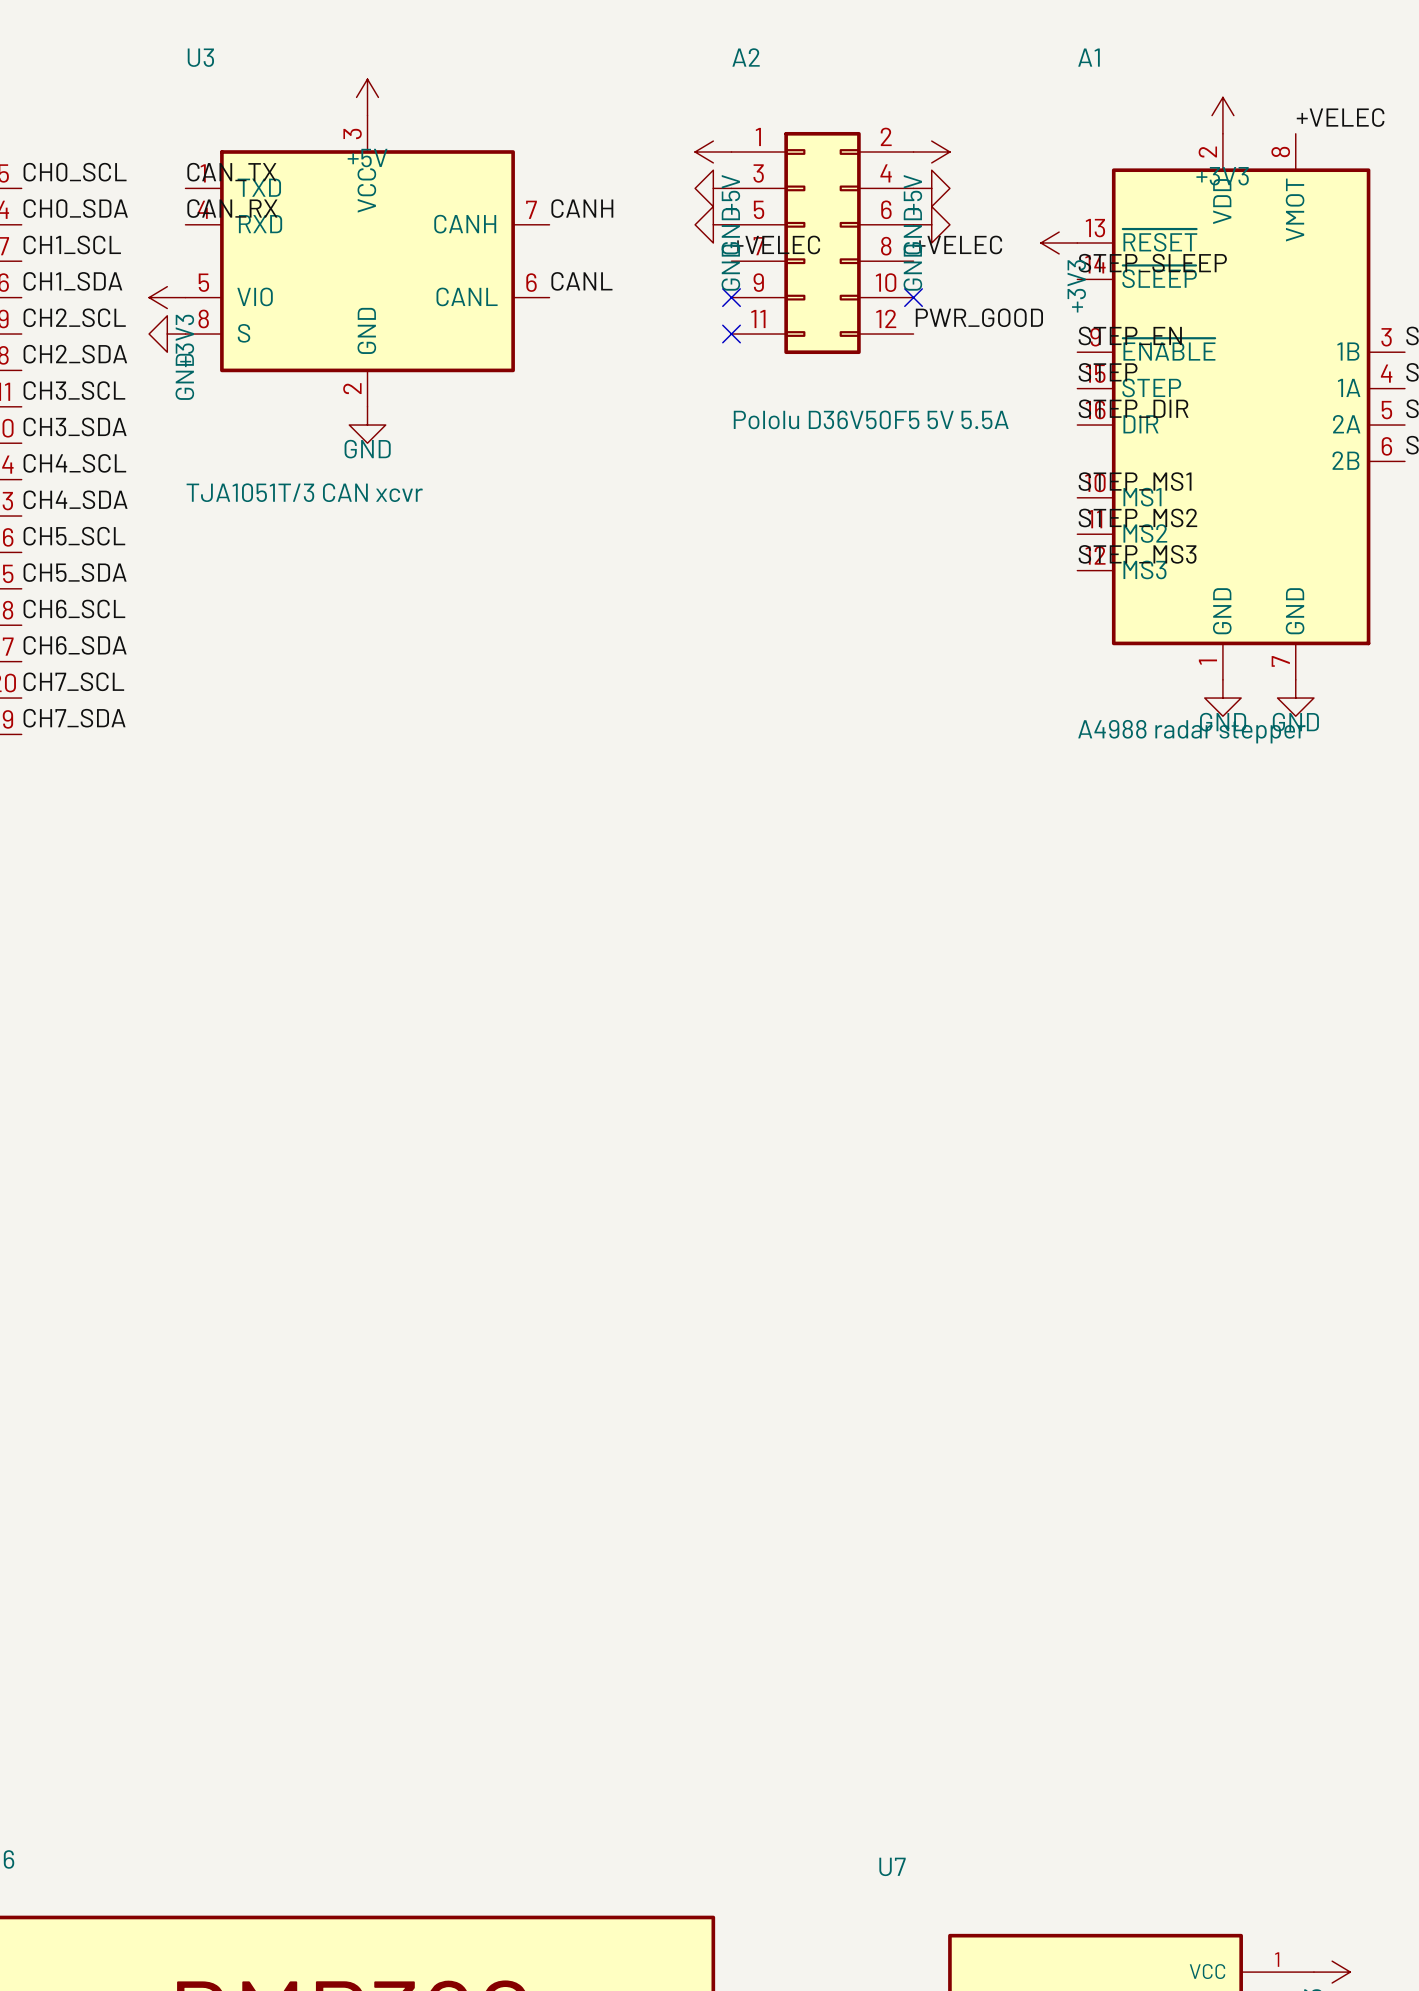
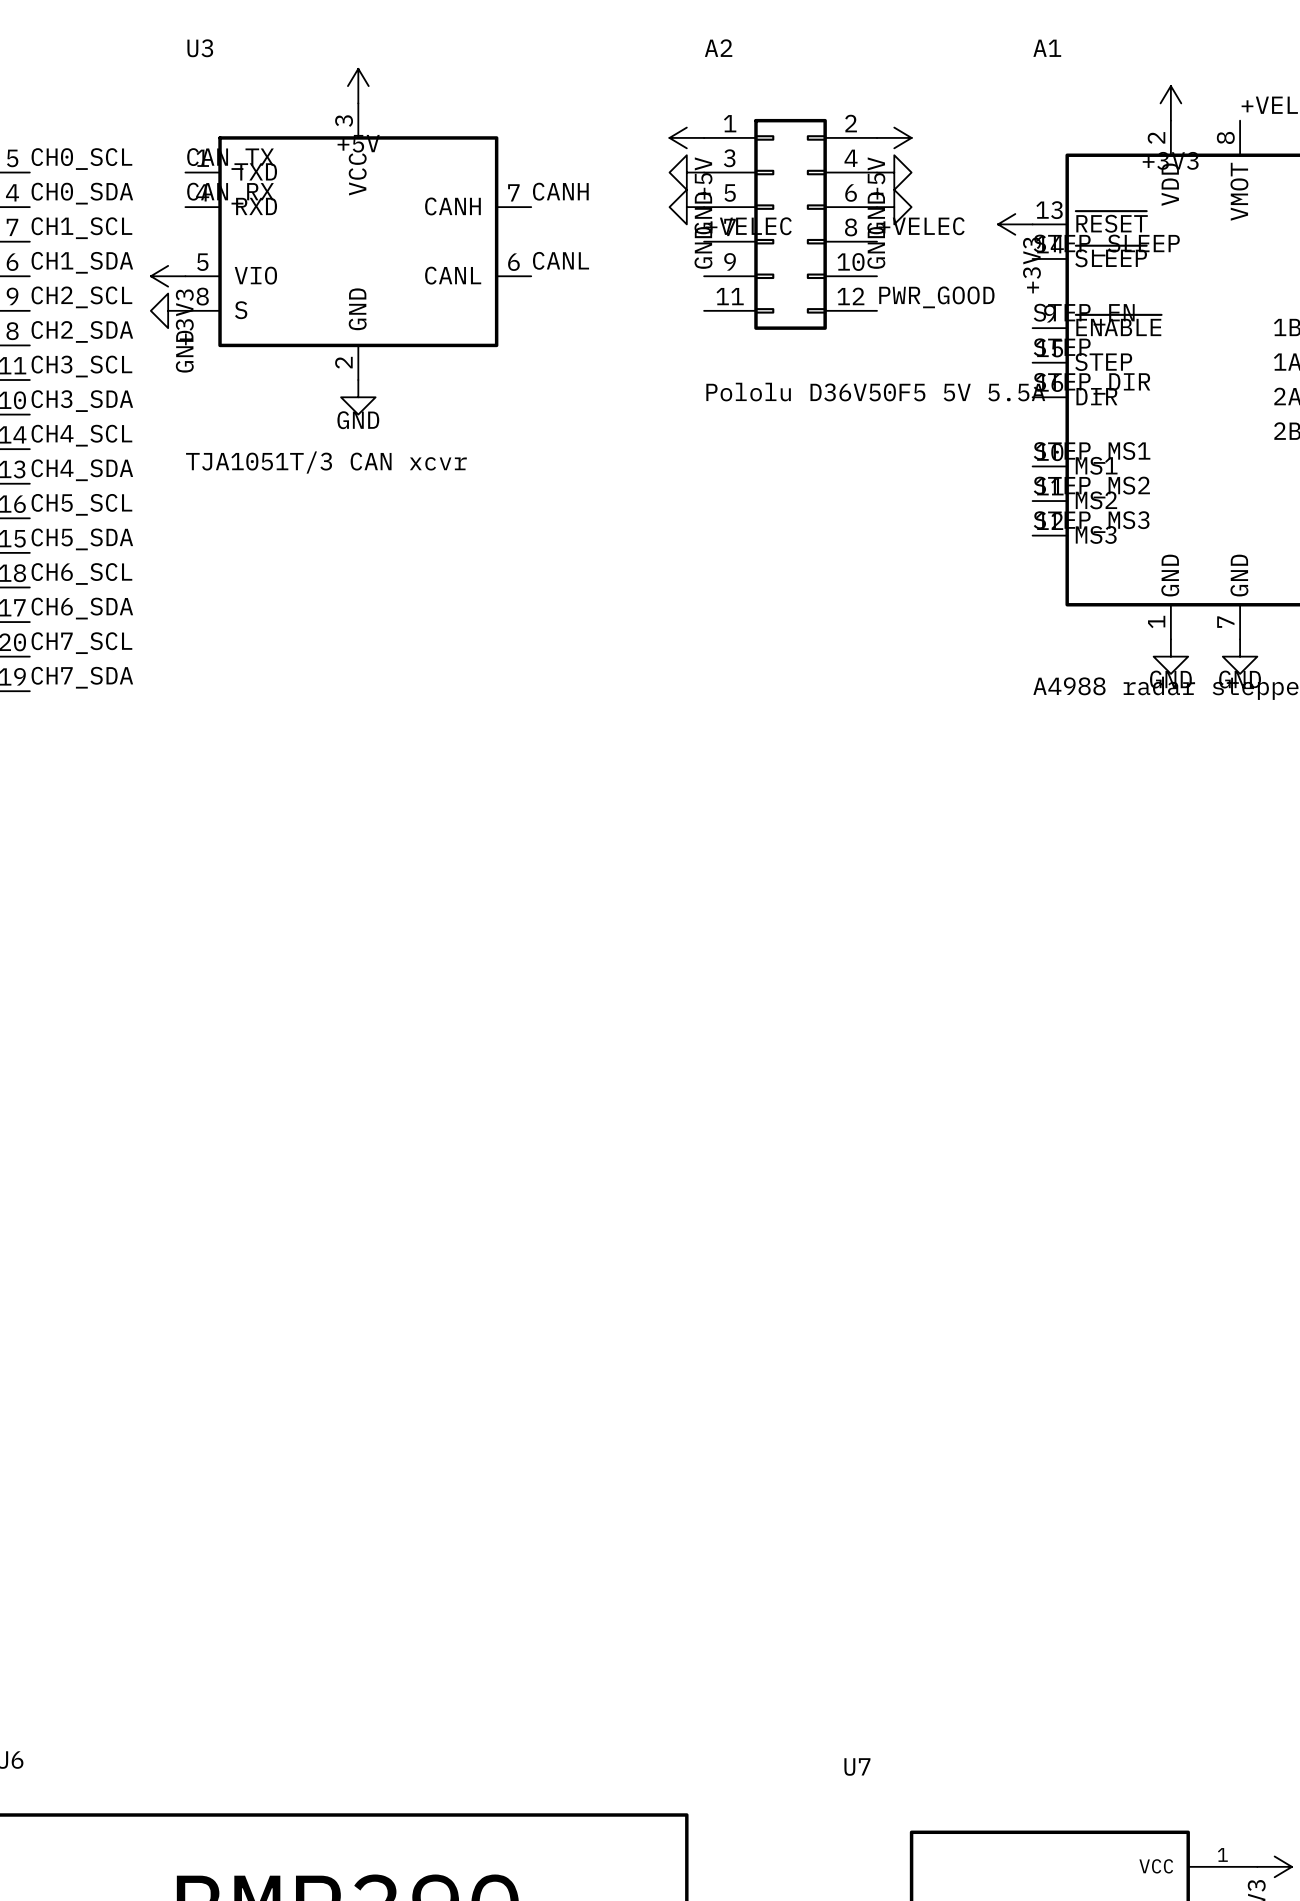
no-connect mark: (731, 297) -> none
no-connect mark: (913, 297) -> none
no-connect mark: (731, 334) -> none

